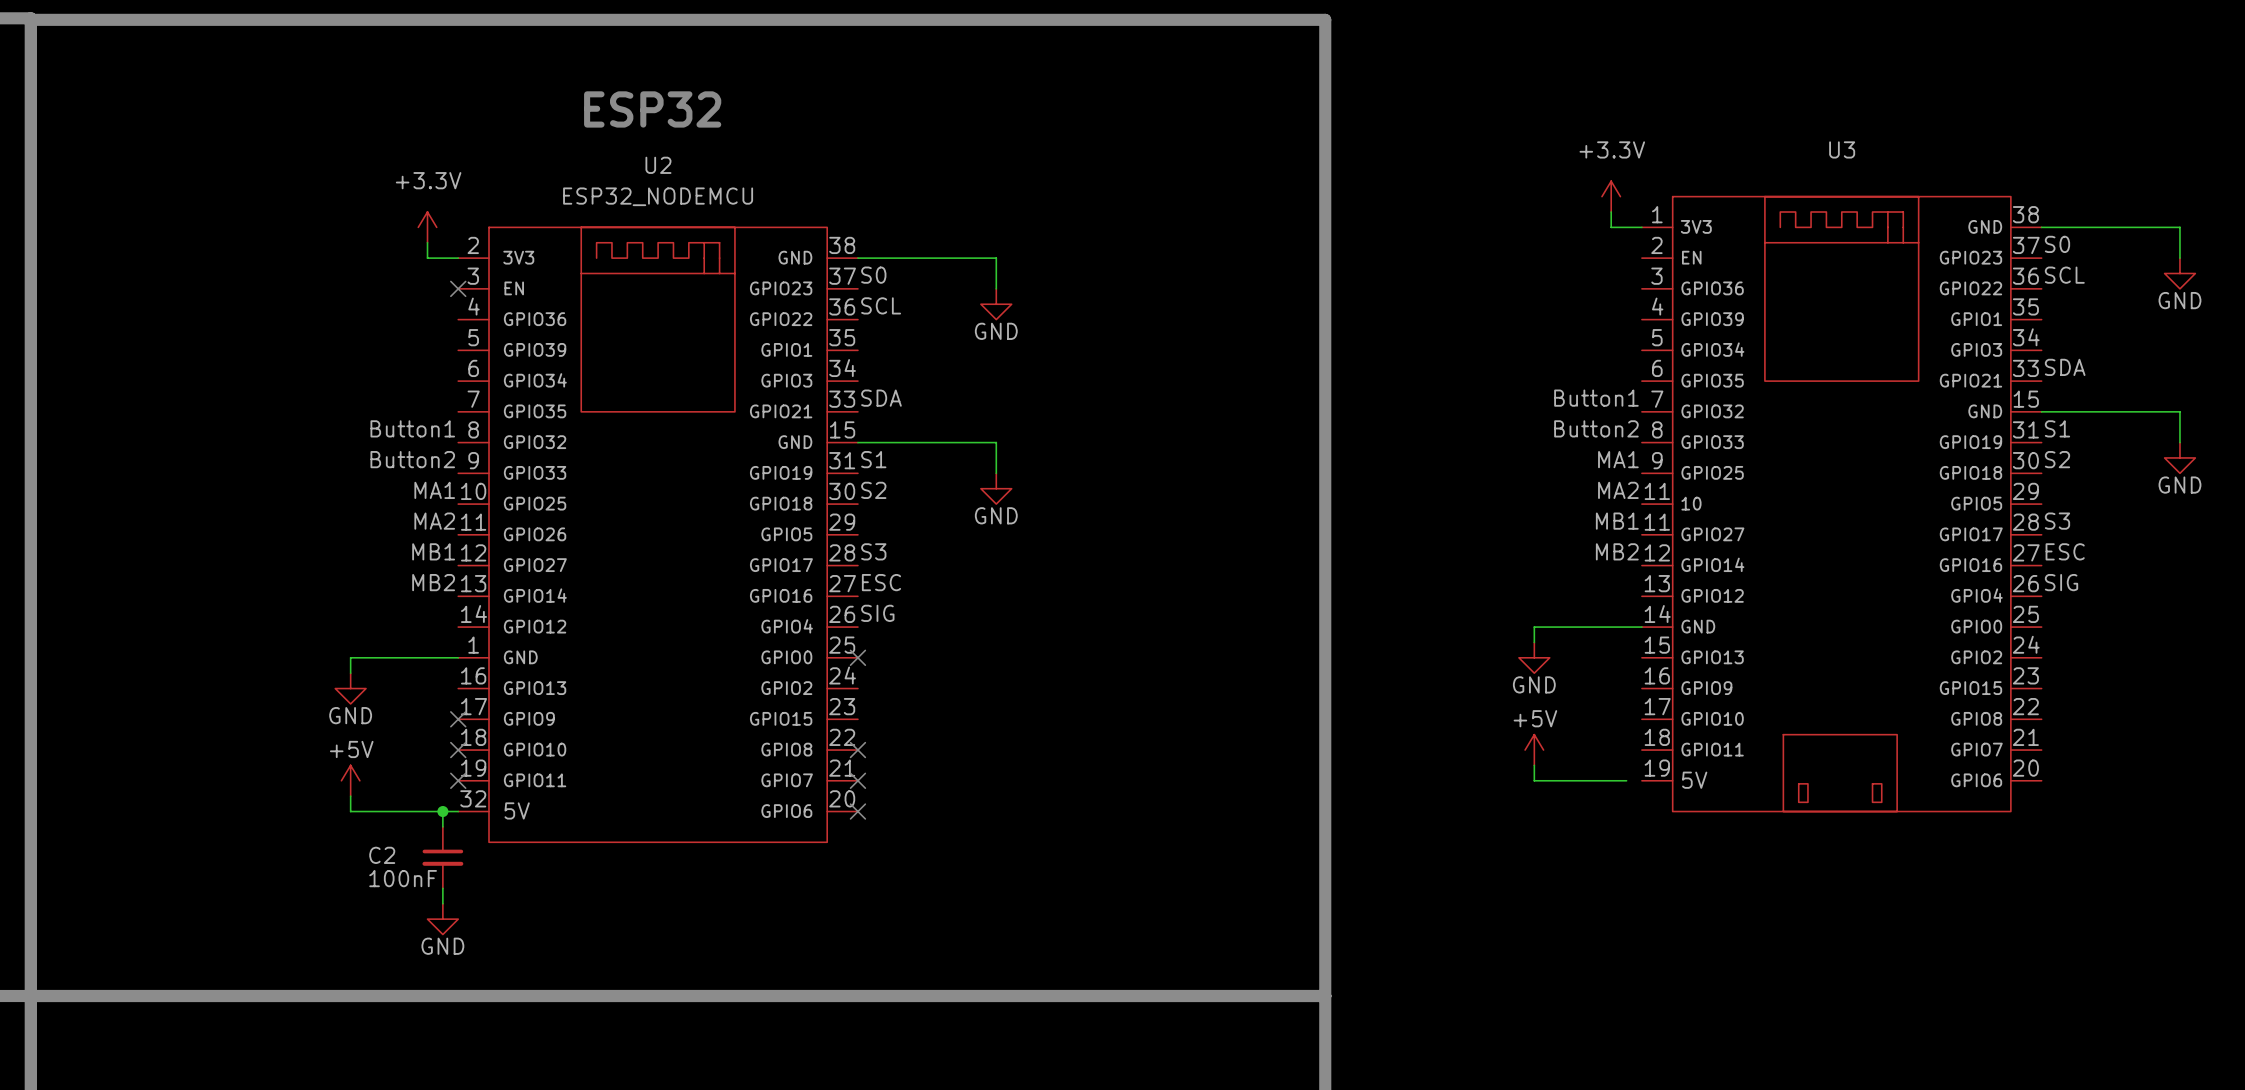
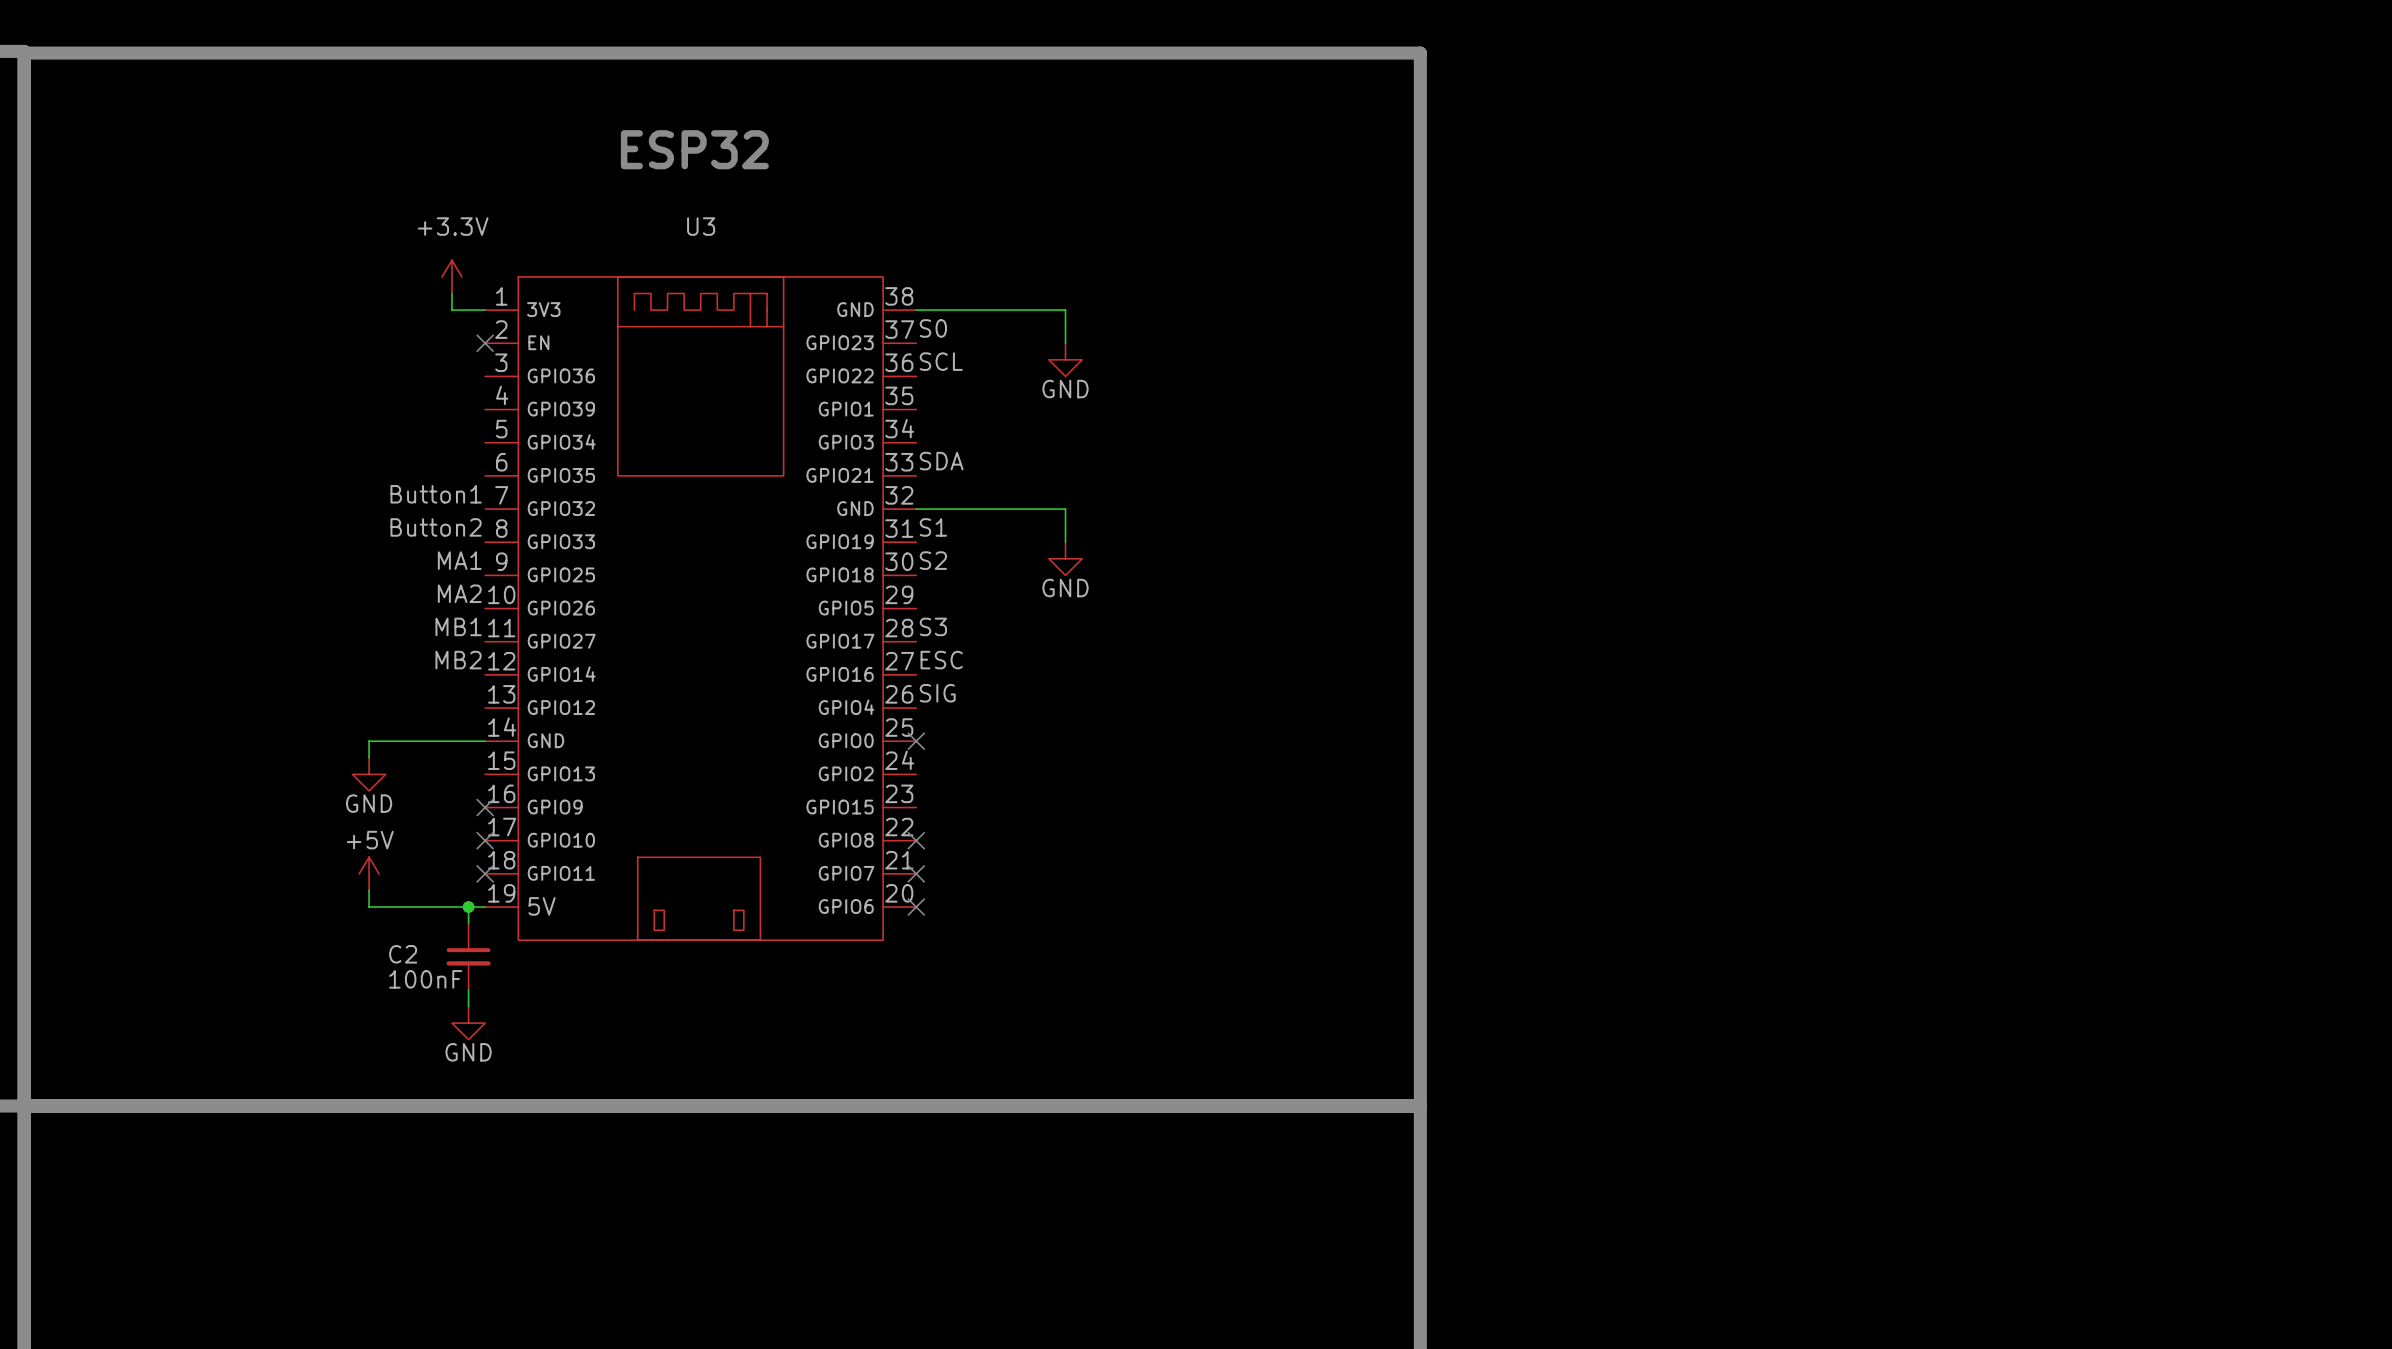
power symbol: +3.3V (1611, 196) -> none
wire: (1611, 212) (1611, 227) (1641, 227) -> none
wire: (2041, 227) (2179, 227) (2179, 258) -> none
label: S0 (2057, 244) -> none
power symbol: GND (2179, 273) -> none
label: SCL (2064, 275) -> none
label: SDA (2065, 367) -> none
label: Button1 (1596, 398) -> none
U3 pin number: 15 (2026, 399) -> 32 (899, 495)
wire: (2041, 411) (2179, 411) (2179, 442) -> none
label: Button2 (1596, 428) -> none
label: S1 (2057, 428) -> none
power symbol: GND (2179, 457) -> none
label: MA1 (1618, 459) -> none
label: S2 (2057, 459) -> none
label: MA2 (1618, 490) -> none
U3 pin number: 11 (1657, 491) -> 10 (501, 594)
U3 pin name: 10 (1691, 503) -> GPIO26 (561, 608)
U3 position: (1841, 504) -> (700, 608)
label: MB1 (1617, 521) -> none
label: S3 (2057, 521) -> none
U2: ESP32_NODEMCU (658, 534) -> none
label: MB2 (1617, 551) -> none
label: ESC (2065, 551) -> none
label: SIG (2061, 582) -> none
wire: (1641, 627) (1534, 627) (1534, 642) -> none
power symbol: GND (1534, 657) -> none
power symbol: +5V (1534, 750) -> none
wire: (1534, 765) (1534, 780) (1626, 780) -> none

